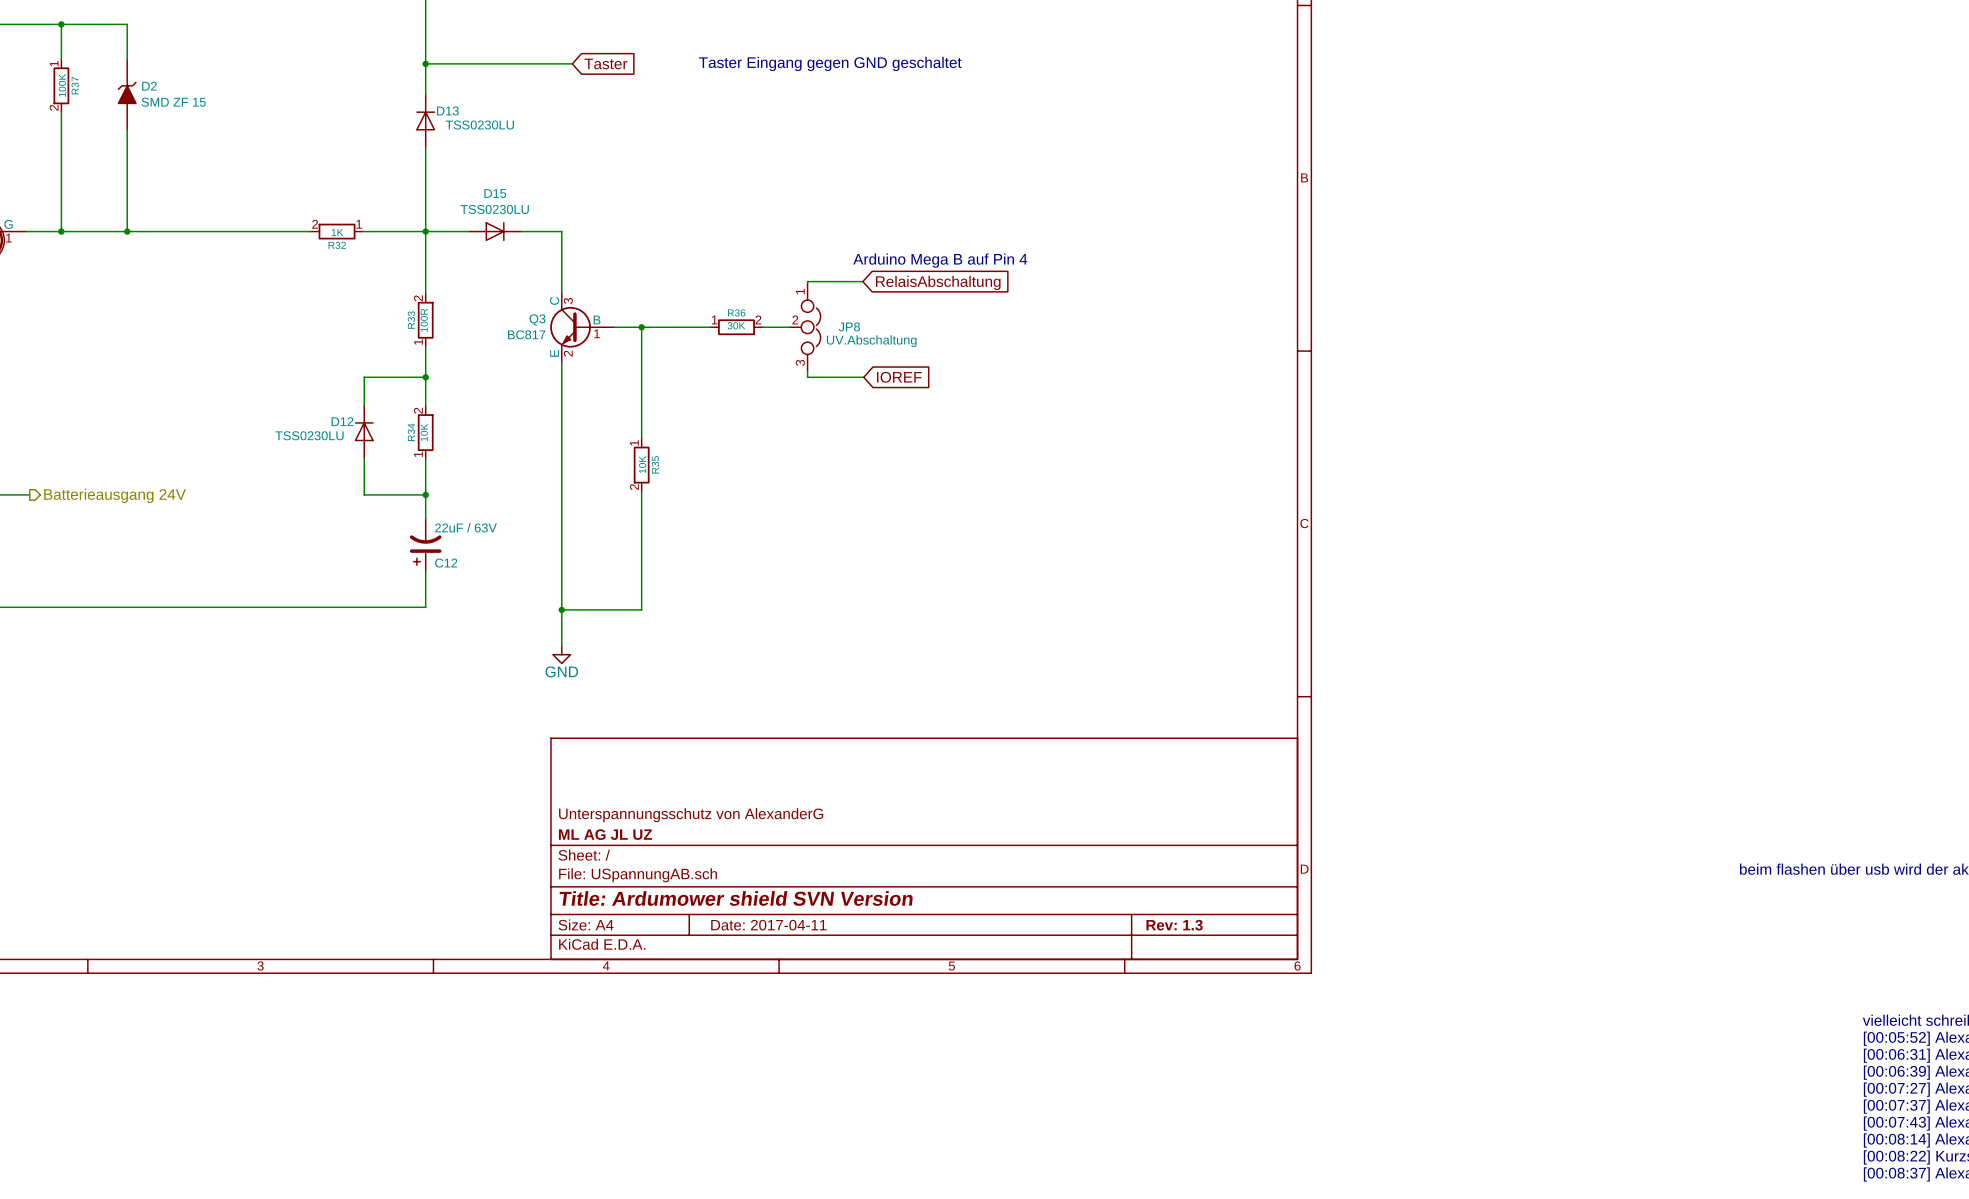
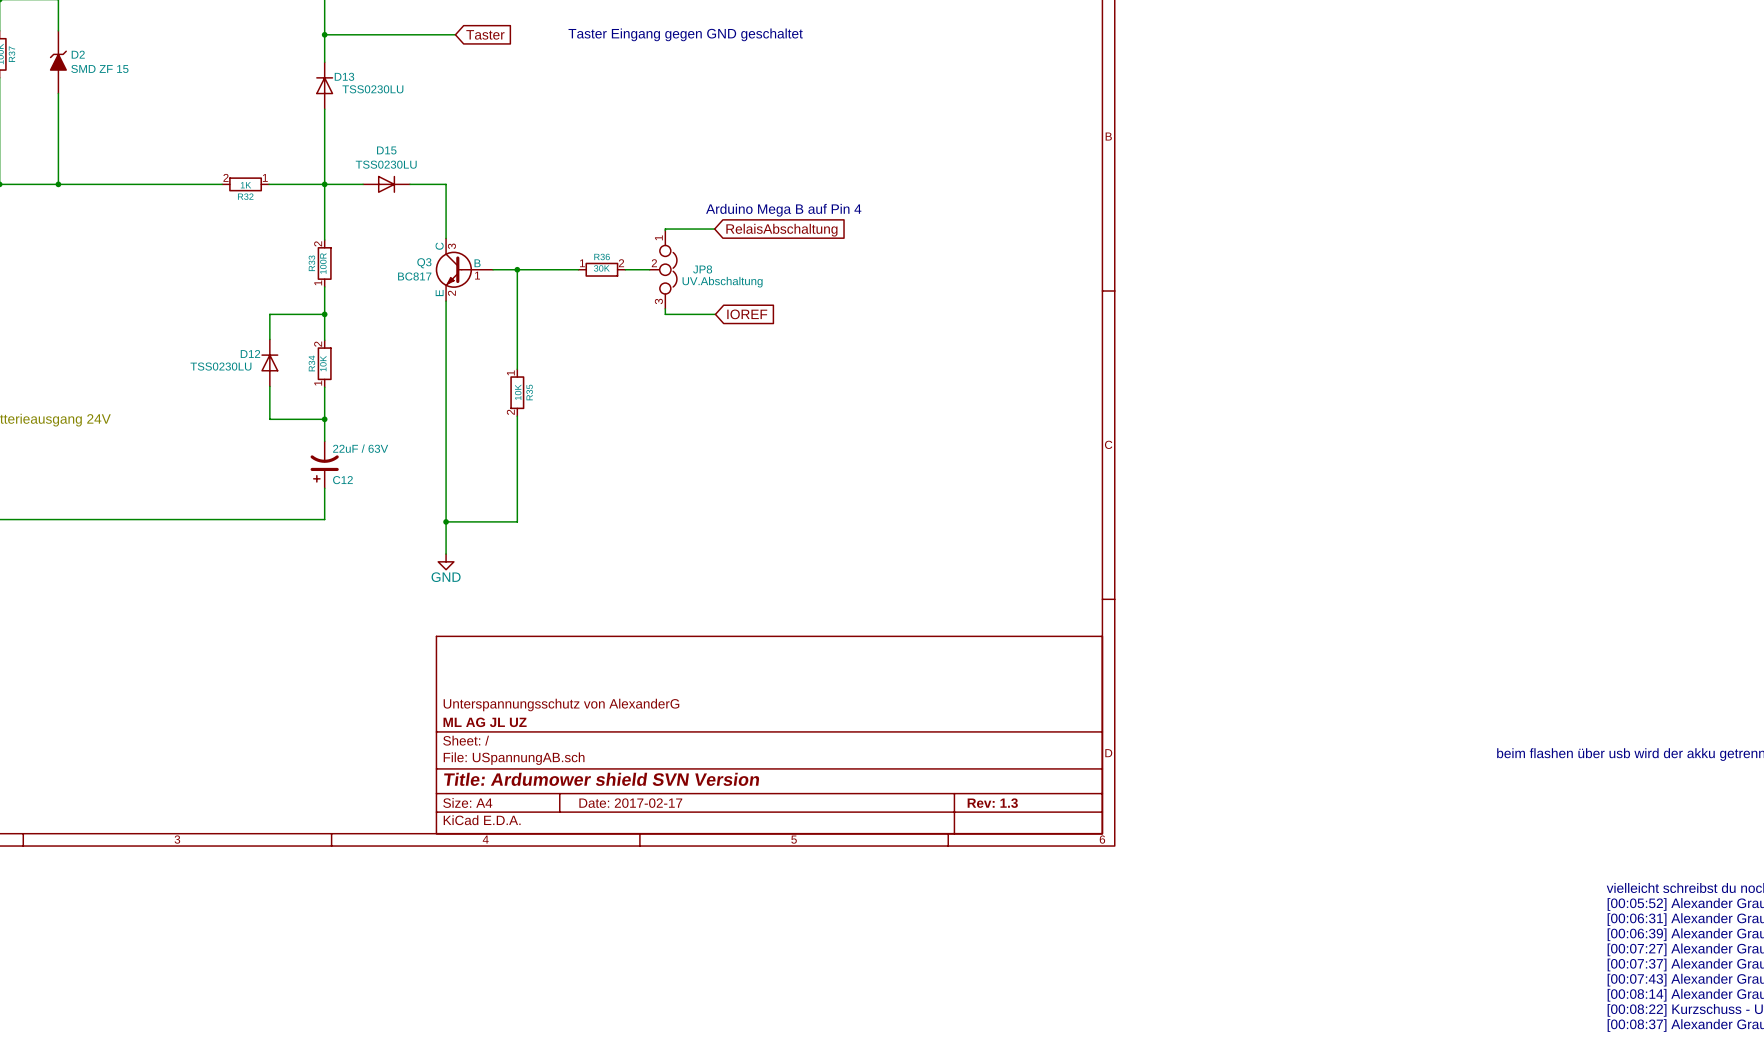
title block: Date: 2017-04-11 (768, 925) -> Date: 2017-02-17 (630, 803)

